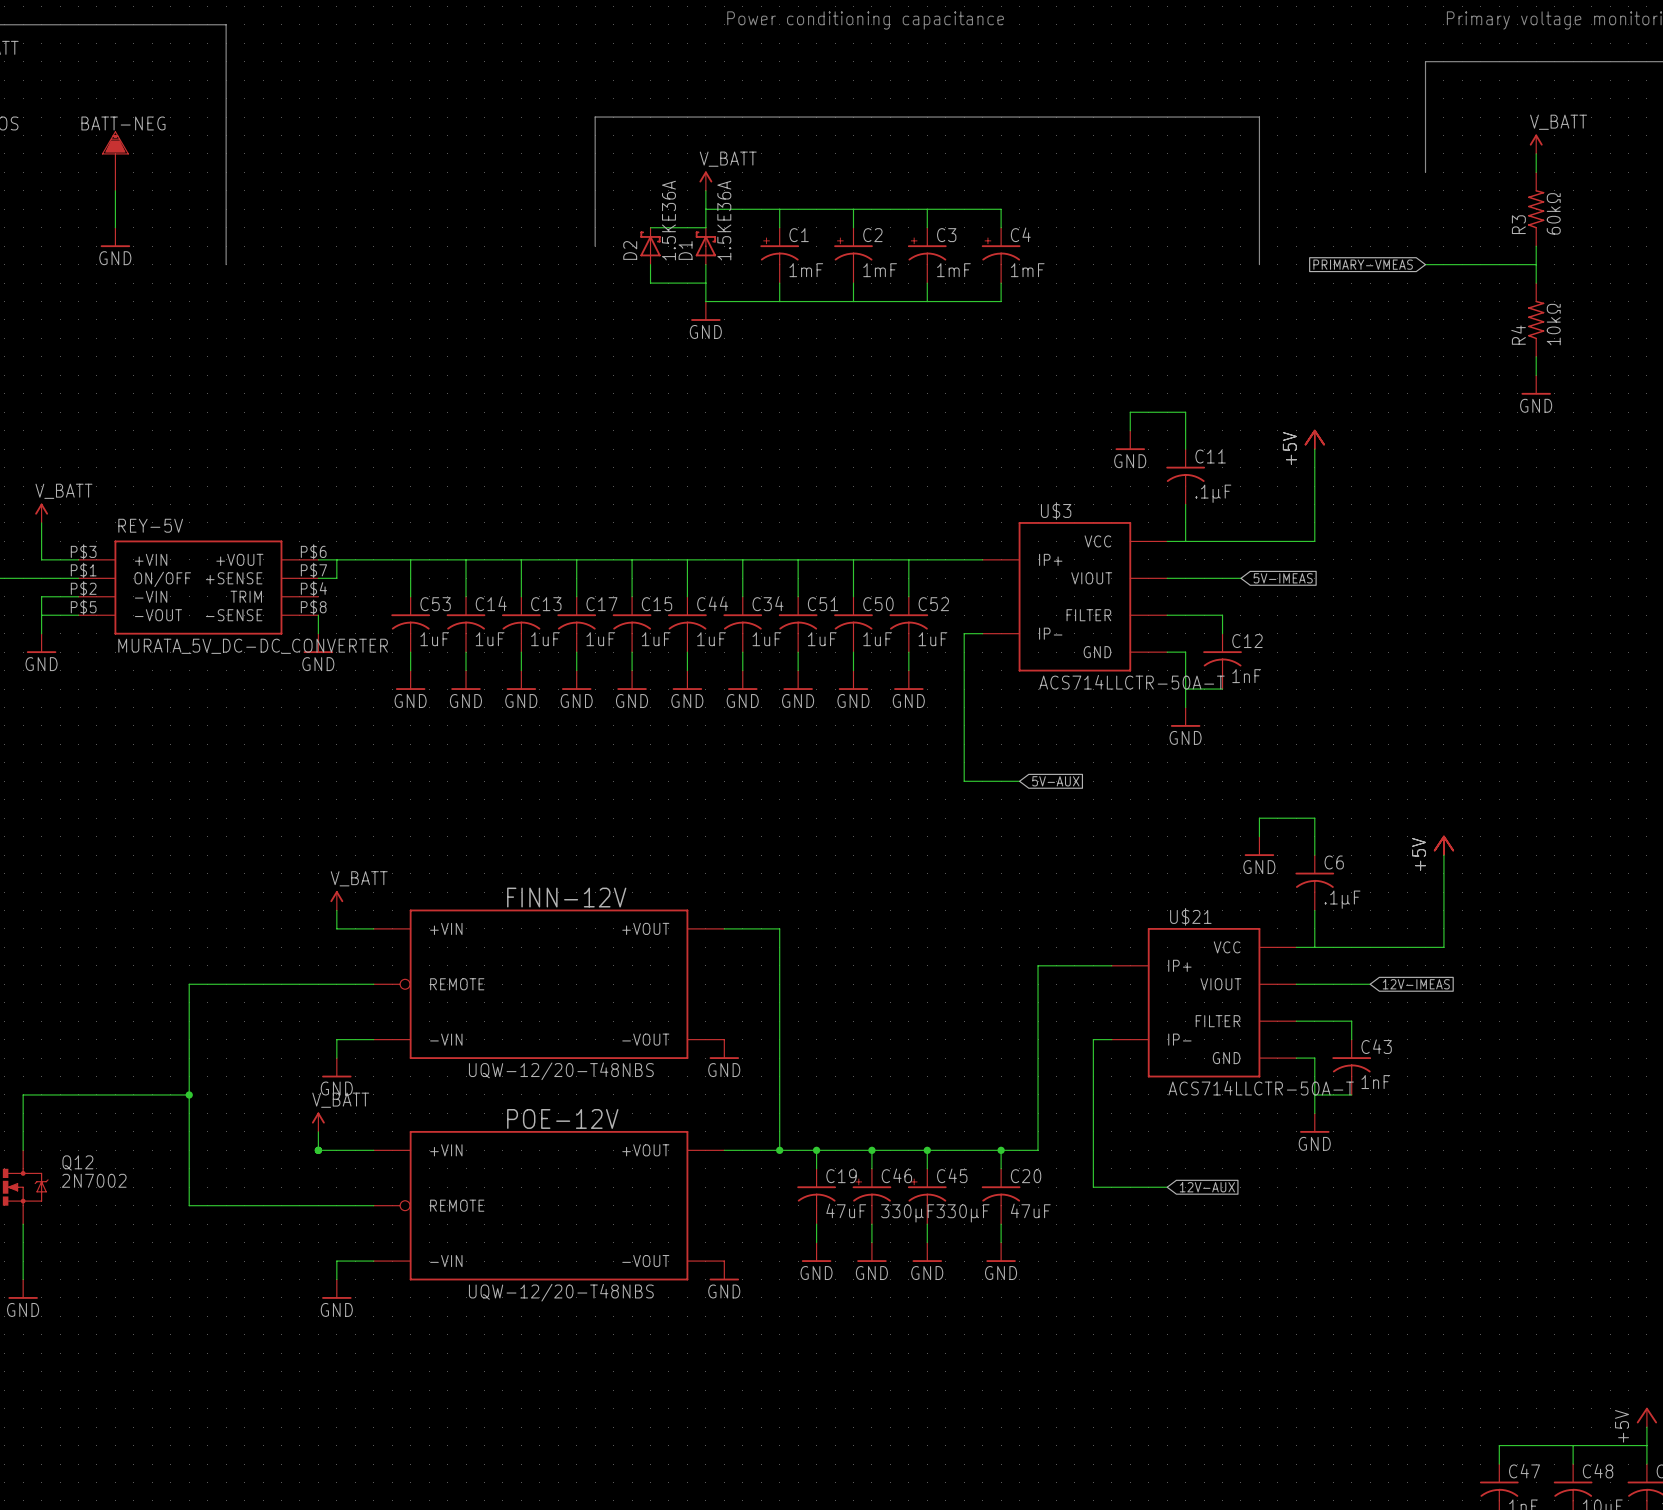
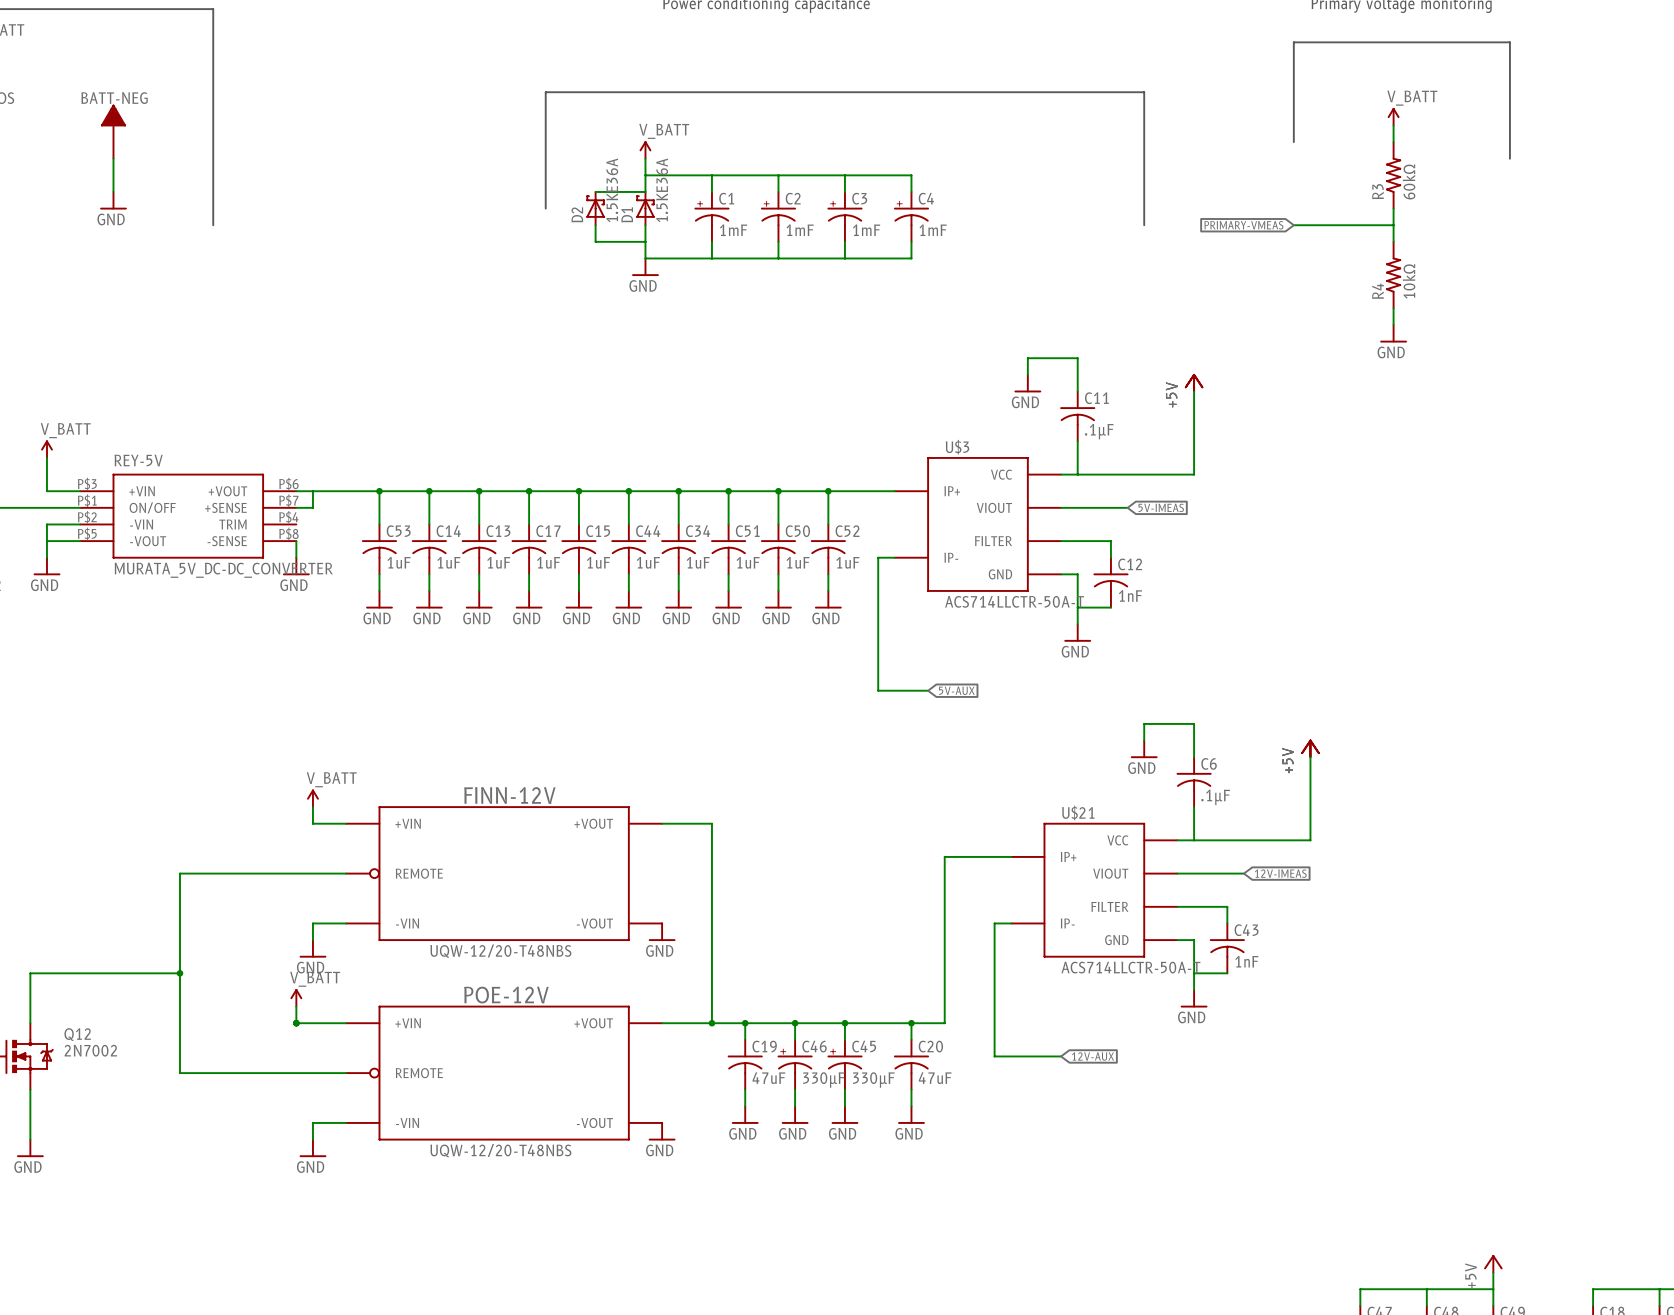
junction: none -> (379, 491)
junction: none -> (429, 491)
junction: none -> (479, 491)
junction: none -> (529, 491)
junction: none -> (578, 491)
junction: none -> (628, 491)
junction: none -> (678, 491)
junction: none -> (728, 491)
junction: none -> (778, 491)
junction: none -> (828, 491)

